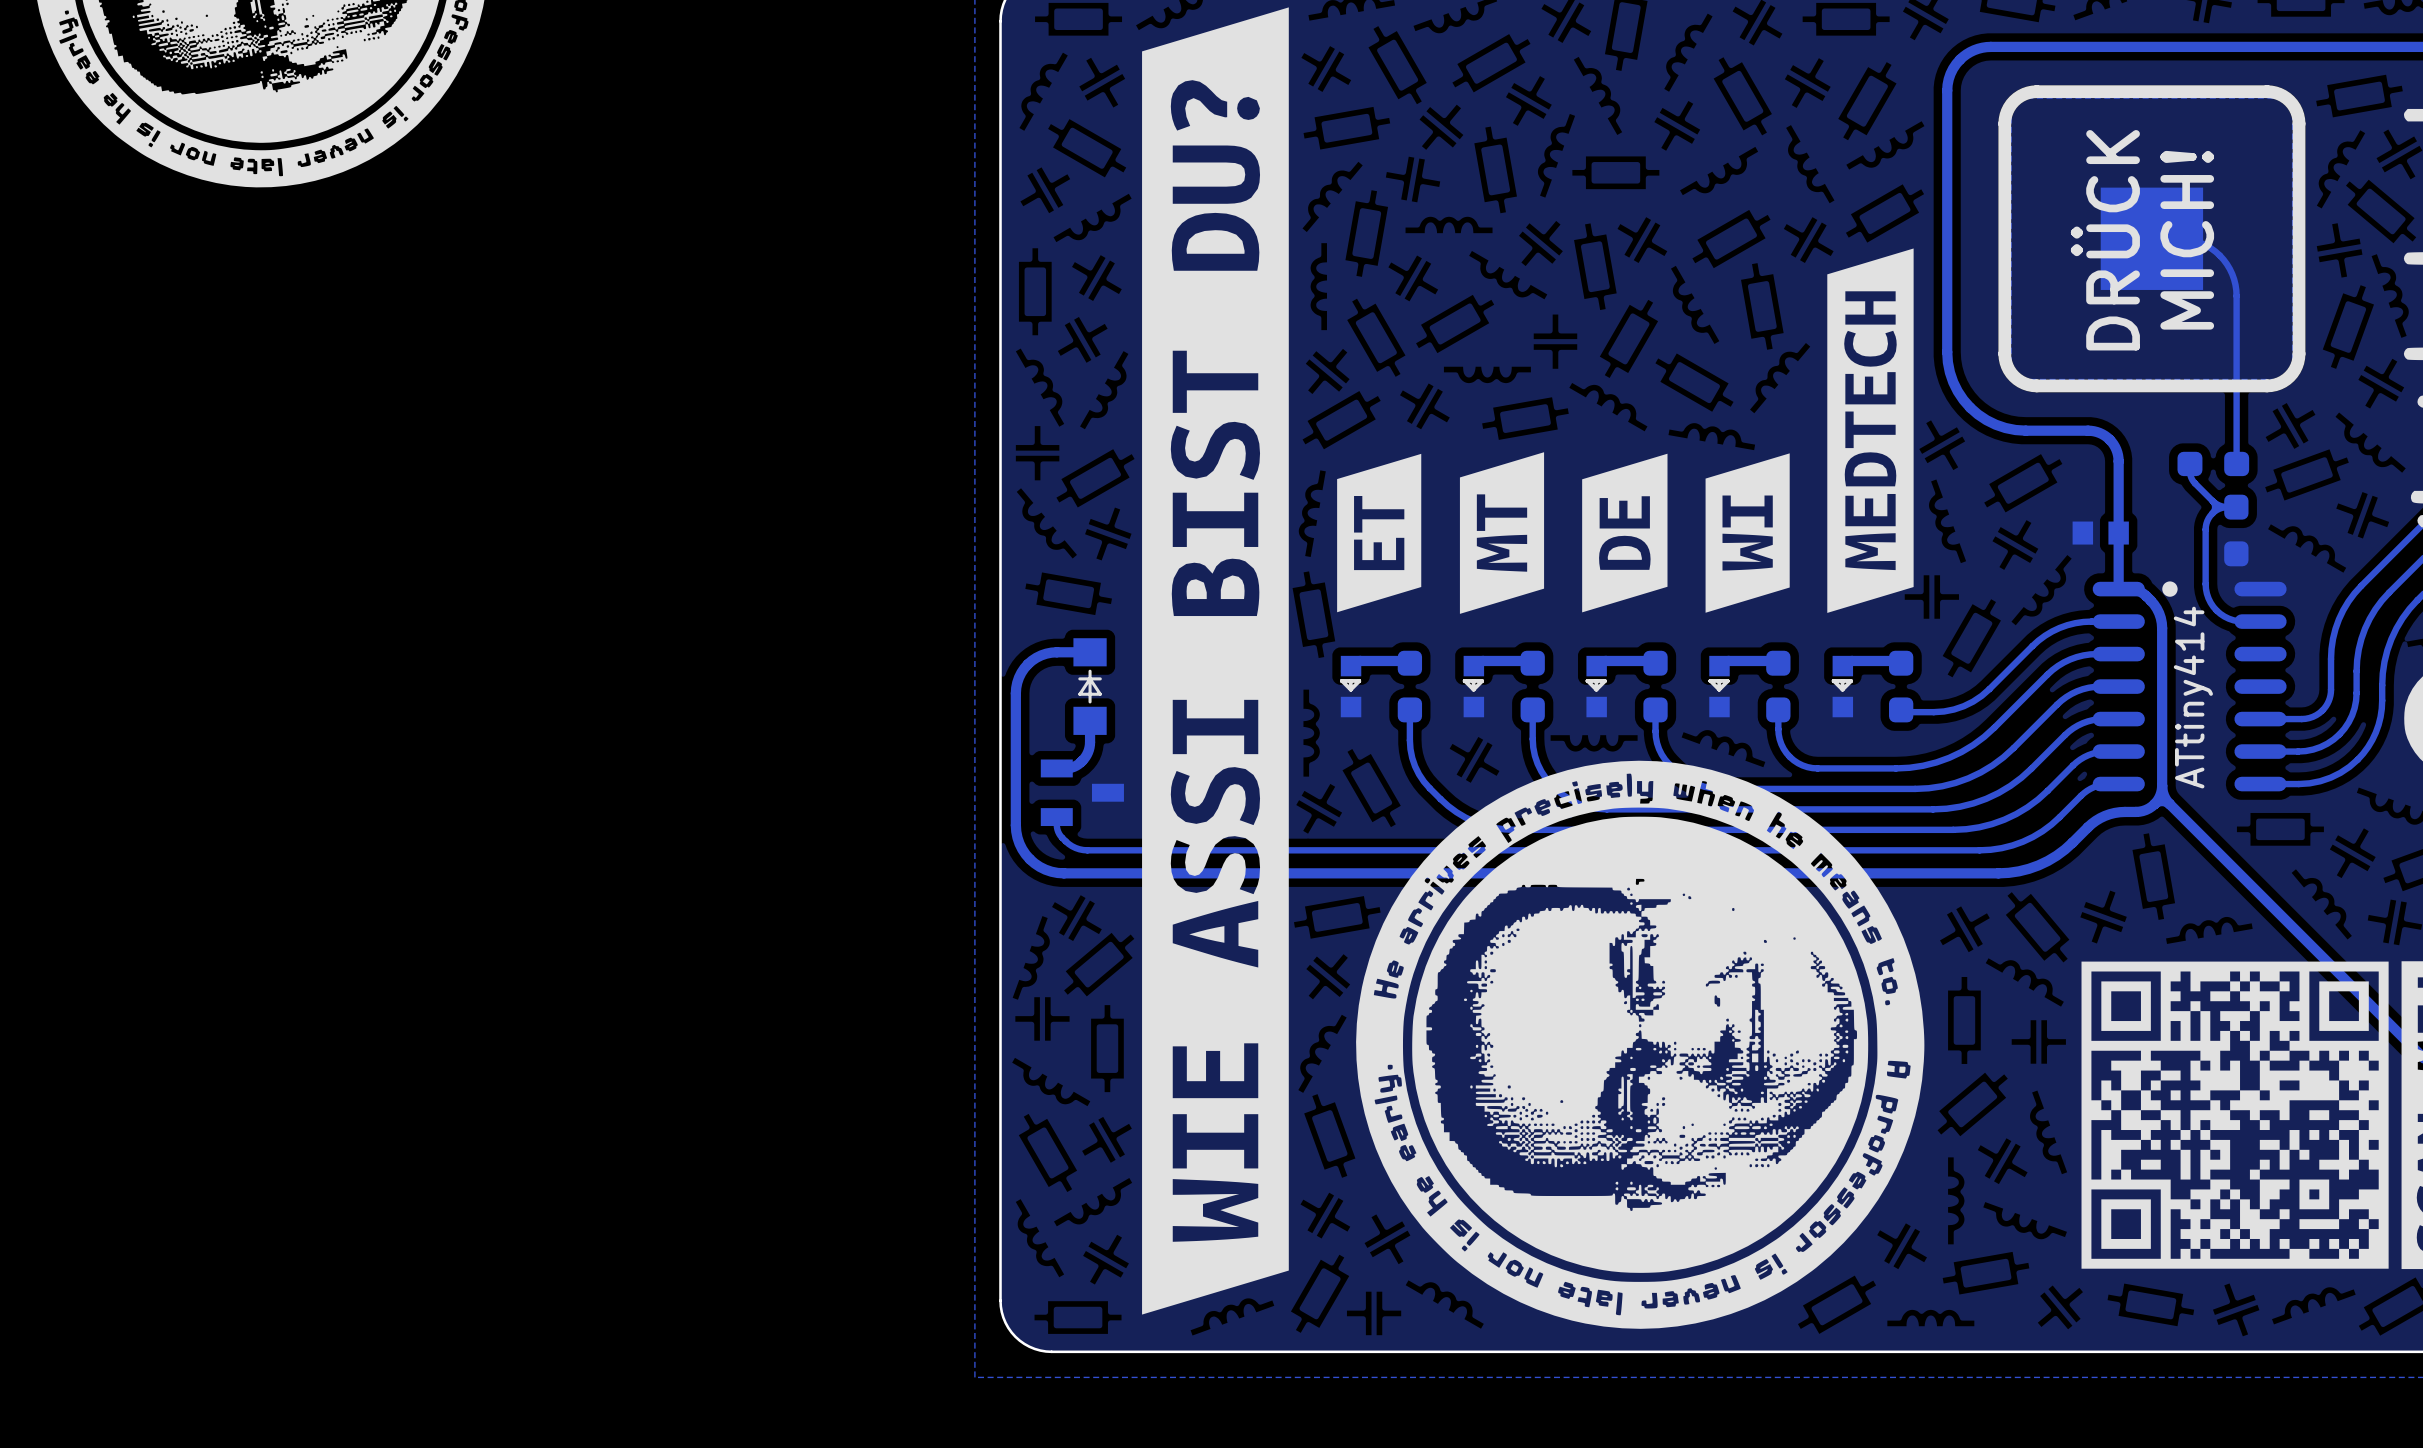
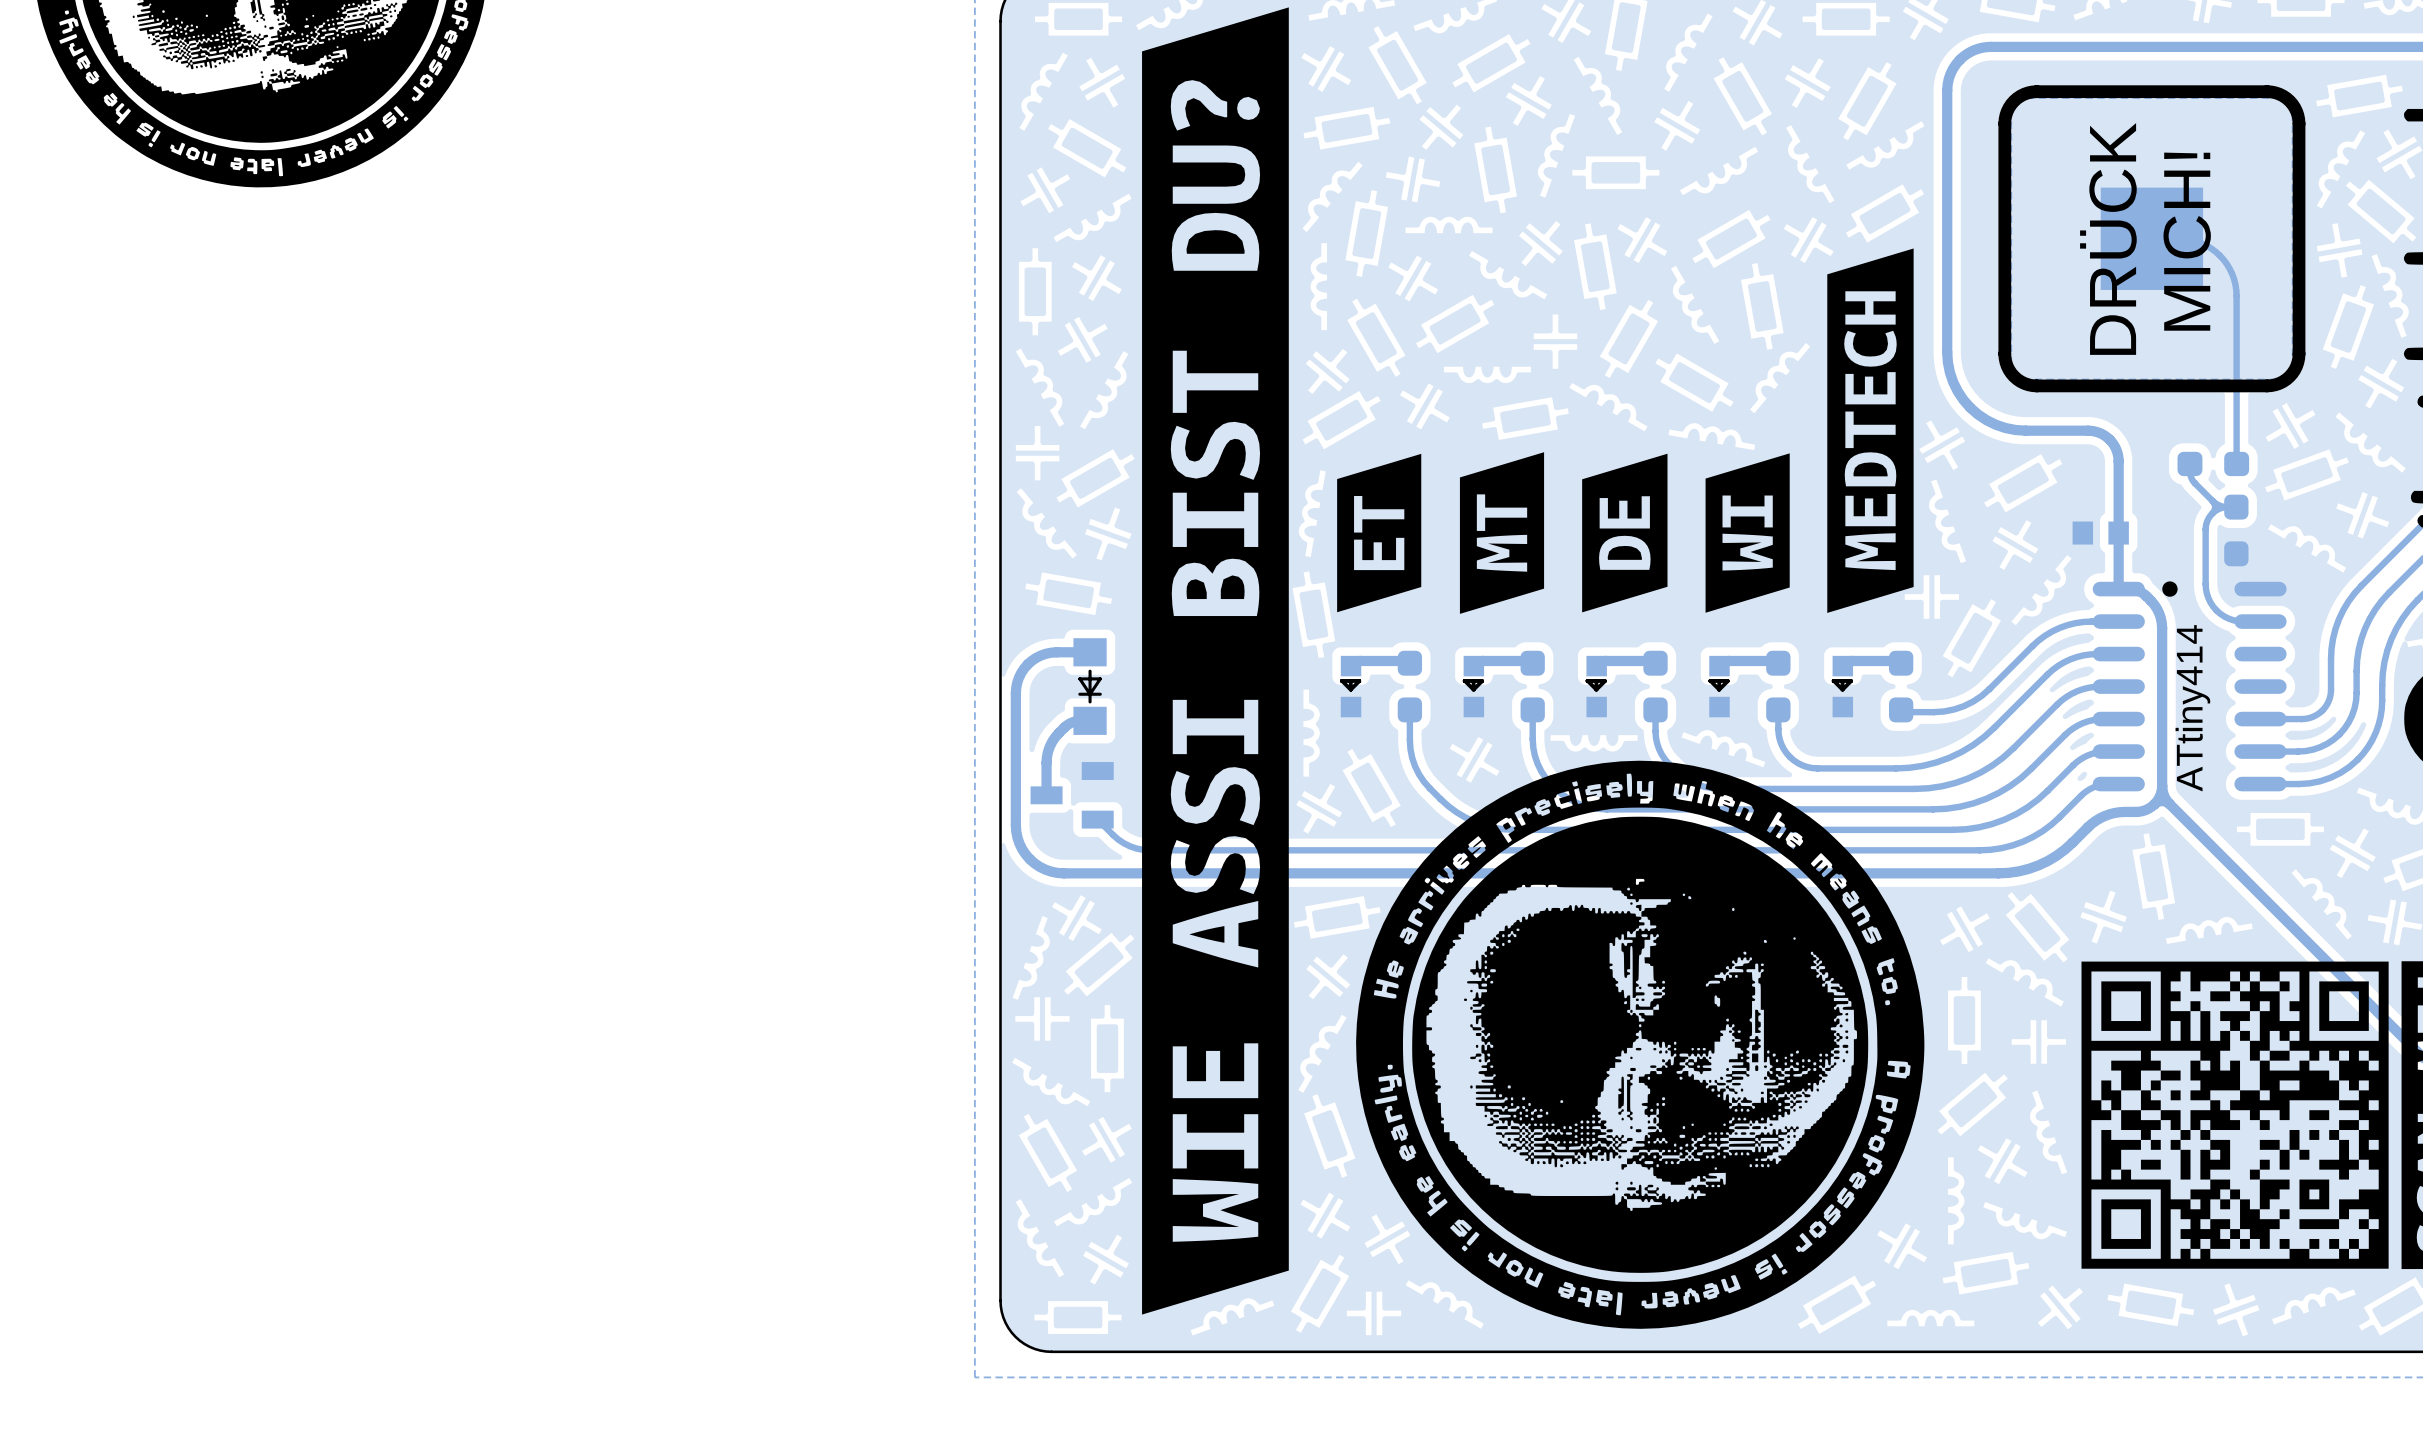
part rotation: 0° (1090, 686) -> 180° (1090, 686)
track: (1090, 720) (1089, 744) (1085, 756) (1074, 766) (1056, 768) -> (1090, 720) (1069, 723) (1052, 741) (1046, 757) (1046, 795)
part rotation: 0° (1082, 792) -> 180° (1072, 795)
track: (1056, 817) (1059, 834) (1075, 847) (1087, 850) (1150, 850) -> (1097, 819) (1123, 843) (1136, 848) (1150, 850)

